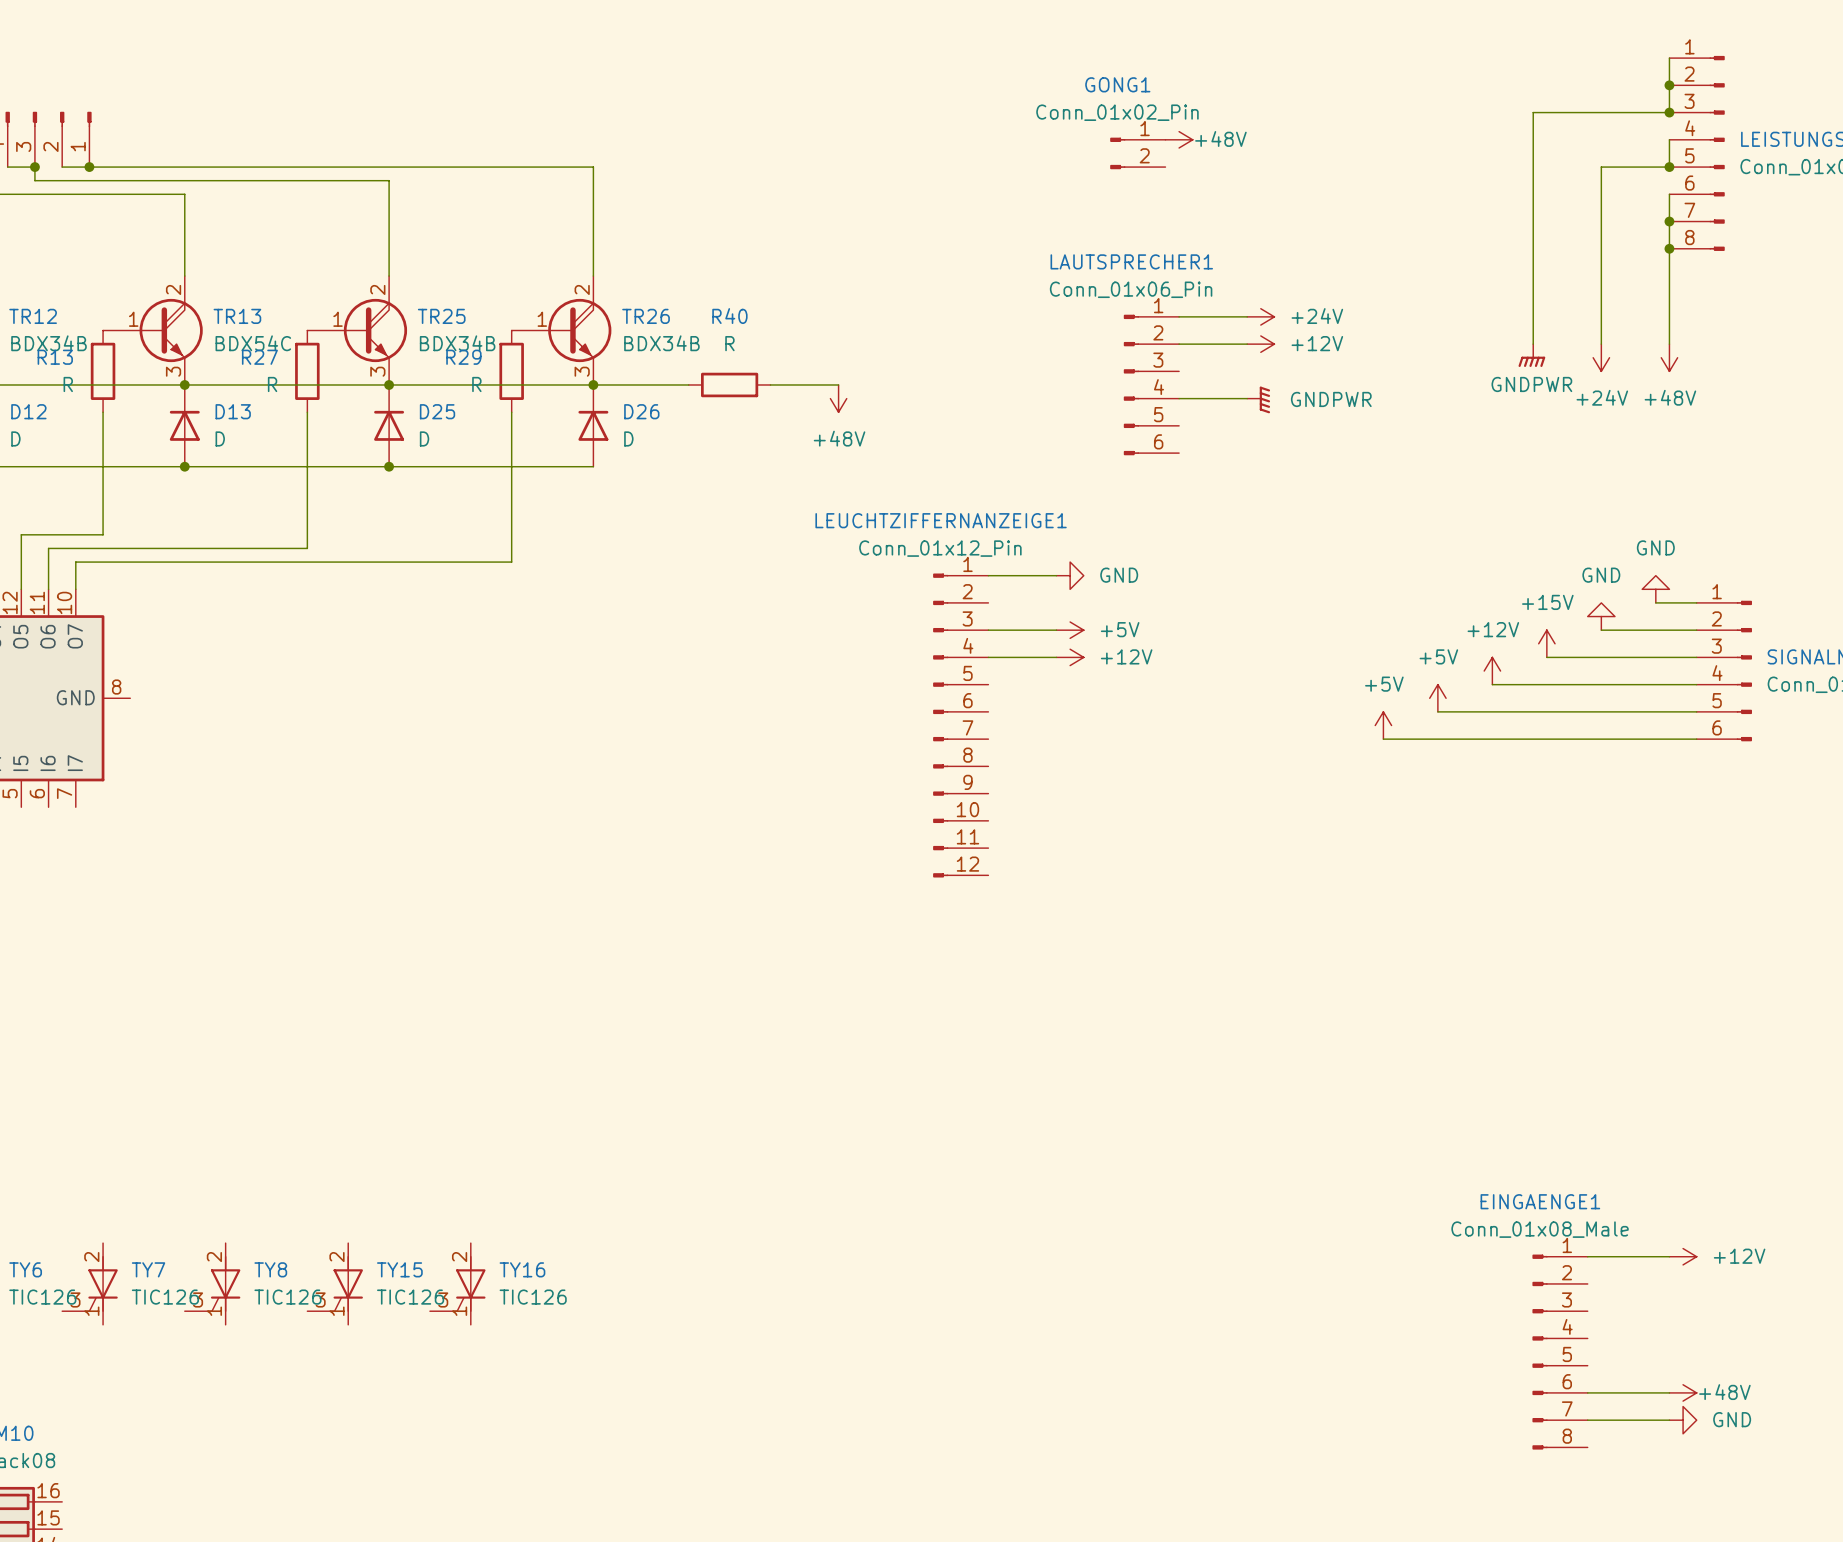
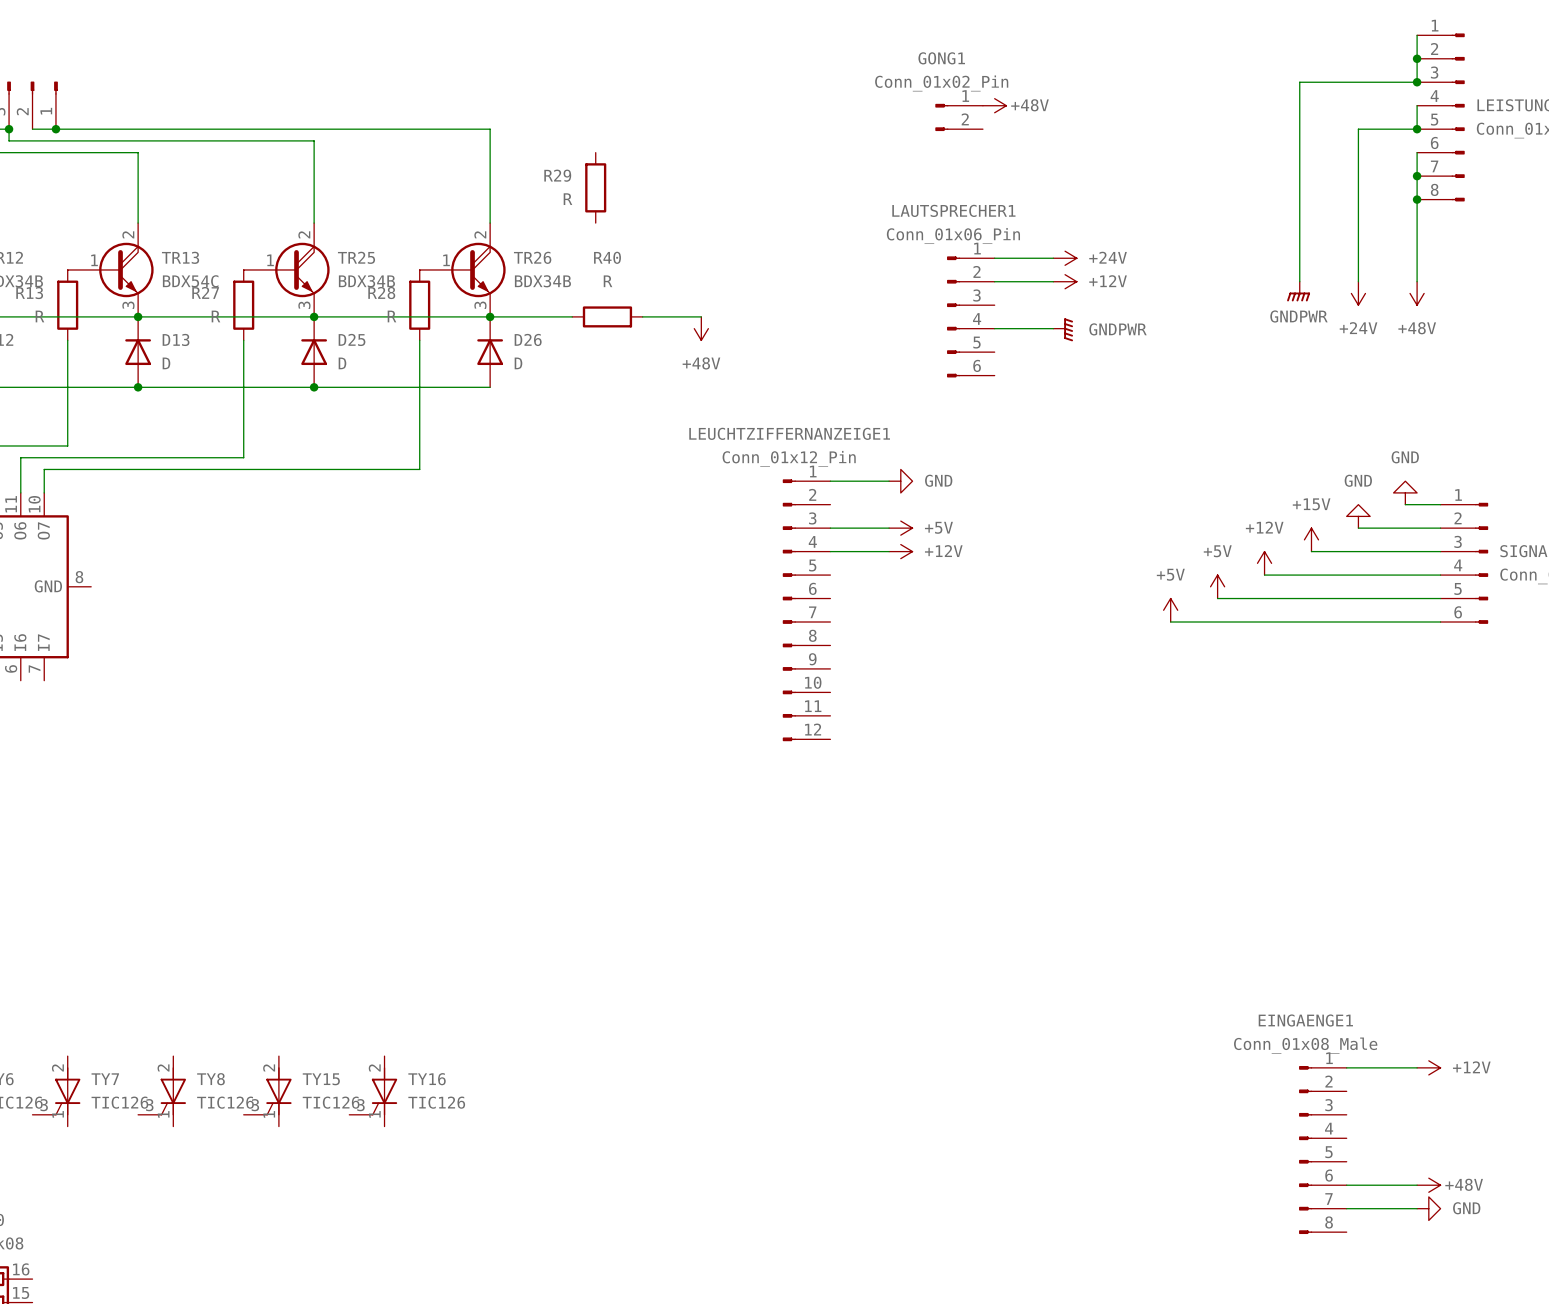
R29: none -> R (595, 187)
R29 name: R29 (463, 357) -> R28 (381, 293)

